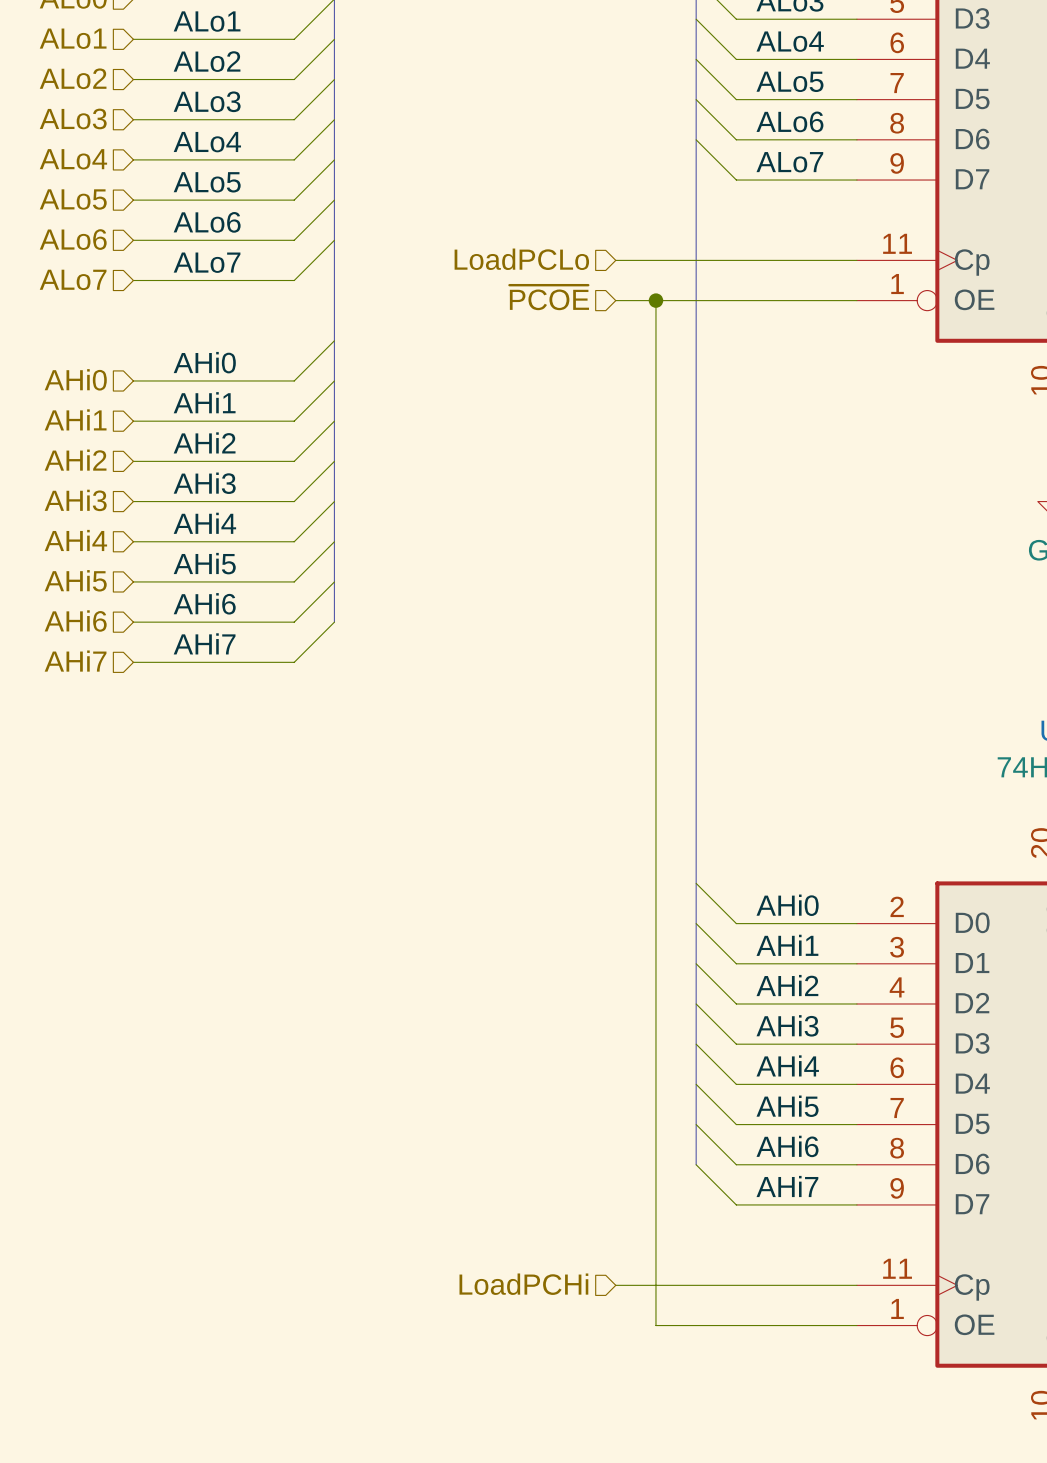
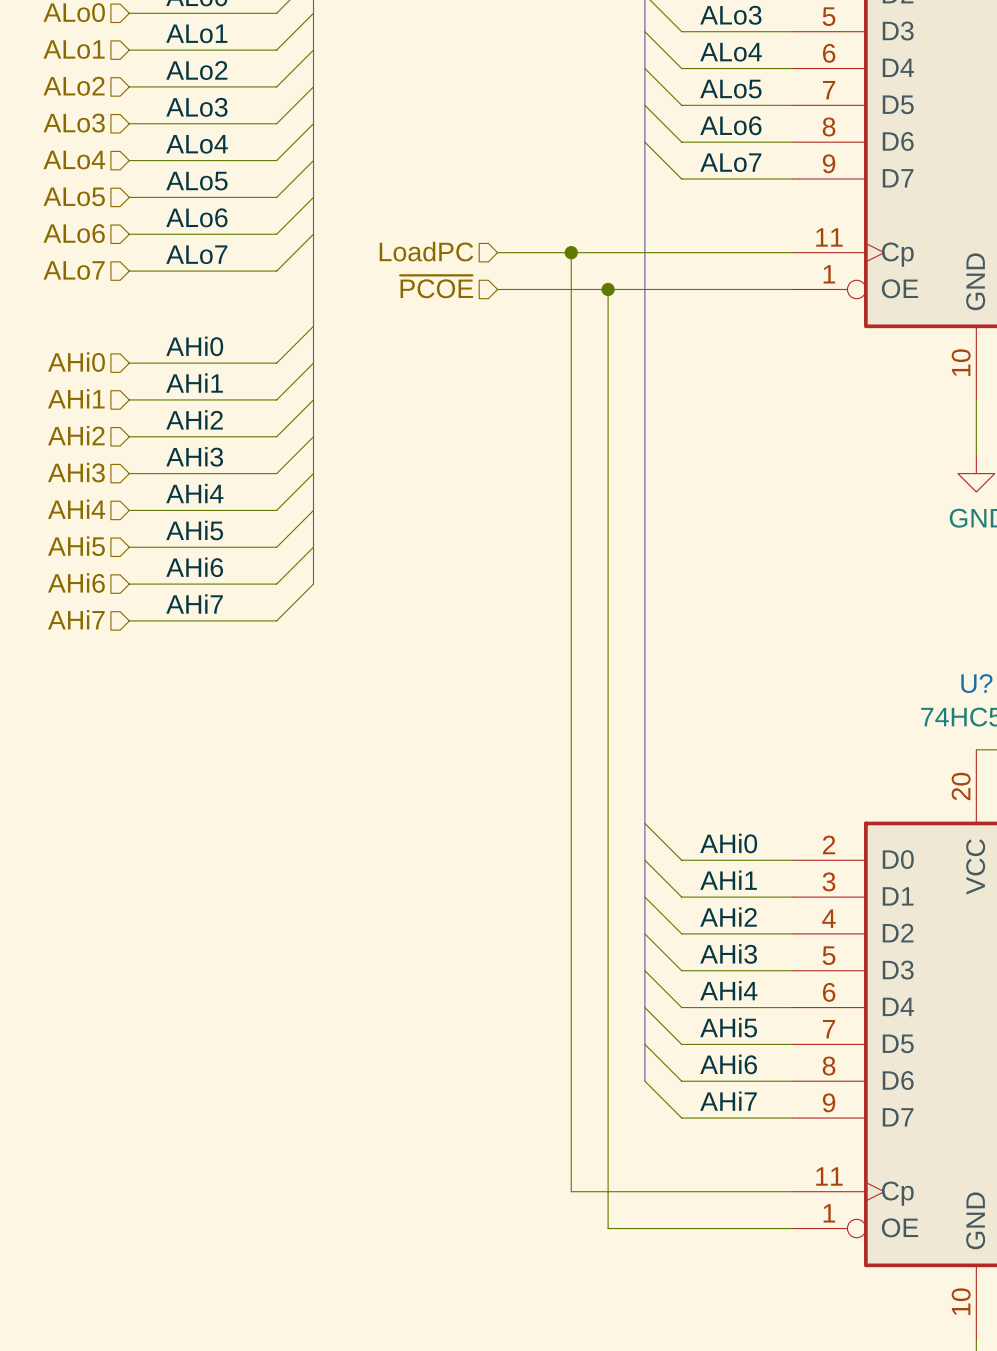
hierarchical label: LoadPCLo (521, 259) -> LoadPC (426, 251)
wire: none -> (497, 252) (571, 252) (571, 1191)
junction: none -> (571, 252)
hierarchical label position: ~{PCOE} (549, 297) -> ~{PCOE} (436, 286)
wire: none -> (497, 289) (571, 289)
hierarchical label: LoadPCHi (523, 1284) -> none

